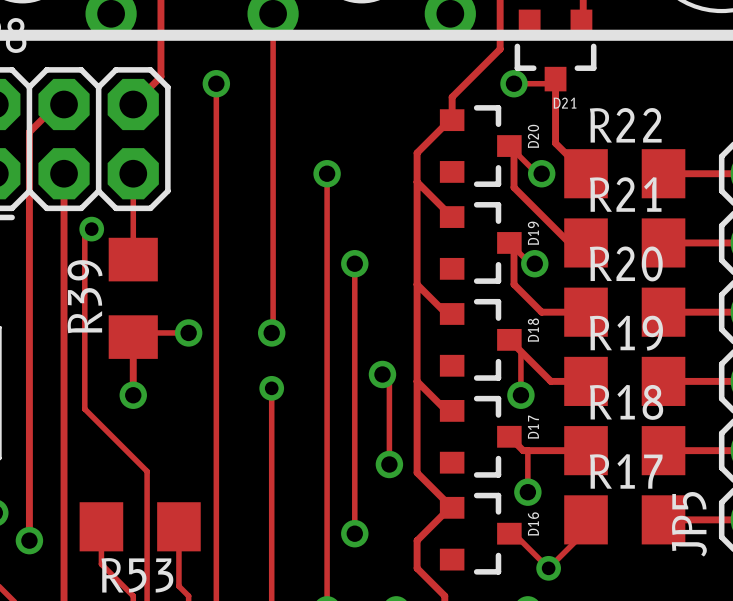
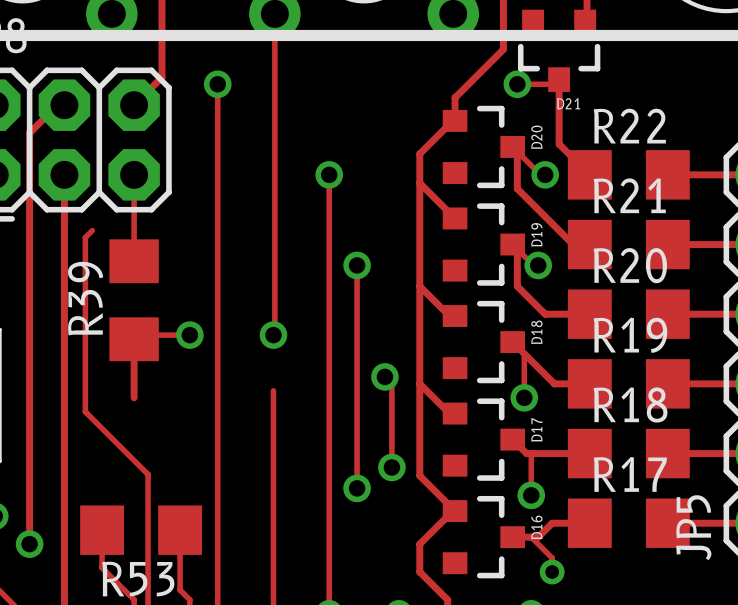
via: (91, 229) -> none
via: (271, 388) -> none
via: (133, 395) -> none
track: (354, 485) (354, 533) -> none
track: (586, 519) (586, 530) (548, 568) (514, 533) -> (589, 523) (552, 523) (538, 537) (517, 537)
via position: (354, 533) -> (357, 488)
track: none -> (531, 537) (552, 558) (552, 571)

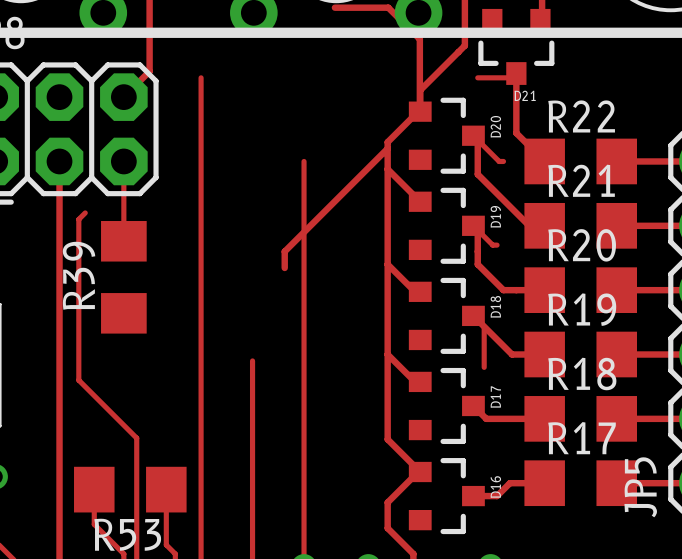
track: none -> (334, 7) (388, 7) (419, 39) (420, 111)
track: (274, 13) (273, 335) -> none
via: (217, 84) -> none
via: (517, 84) -> none
track: (64, 105) (57, 105) (29, 133) (29, 544) -> none
track: none -> (387, 148) (284, 251) (284, 267)
via: (329, 174) -> none
via: (545, 174) -> none
track: (357, 265) (357, 488) -> none
via: (357, 265) -> none
via: (538, 265) -> none
track: (189, 335) (138, 335) (134, 339) (134, 397) -> none
via: (189, 335) -> none
via: (273, 335) -> none
track: (384, 376) (391, 383) (391, 467) -> none
via: (384, 376) -> none
via: (524, 397) -> none
track: (531, 453) (531, 495) -> none
via: (391, 467) -> none
via: (357, 488) -> none
via: (531, 495) -> none
track: (531, 537) (552, 558) (552, 571) -> none
via: (29, 544) -> none
via: (552, 571) -> none

